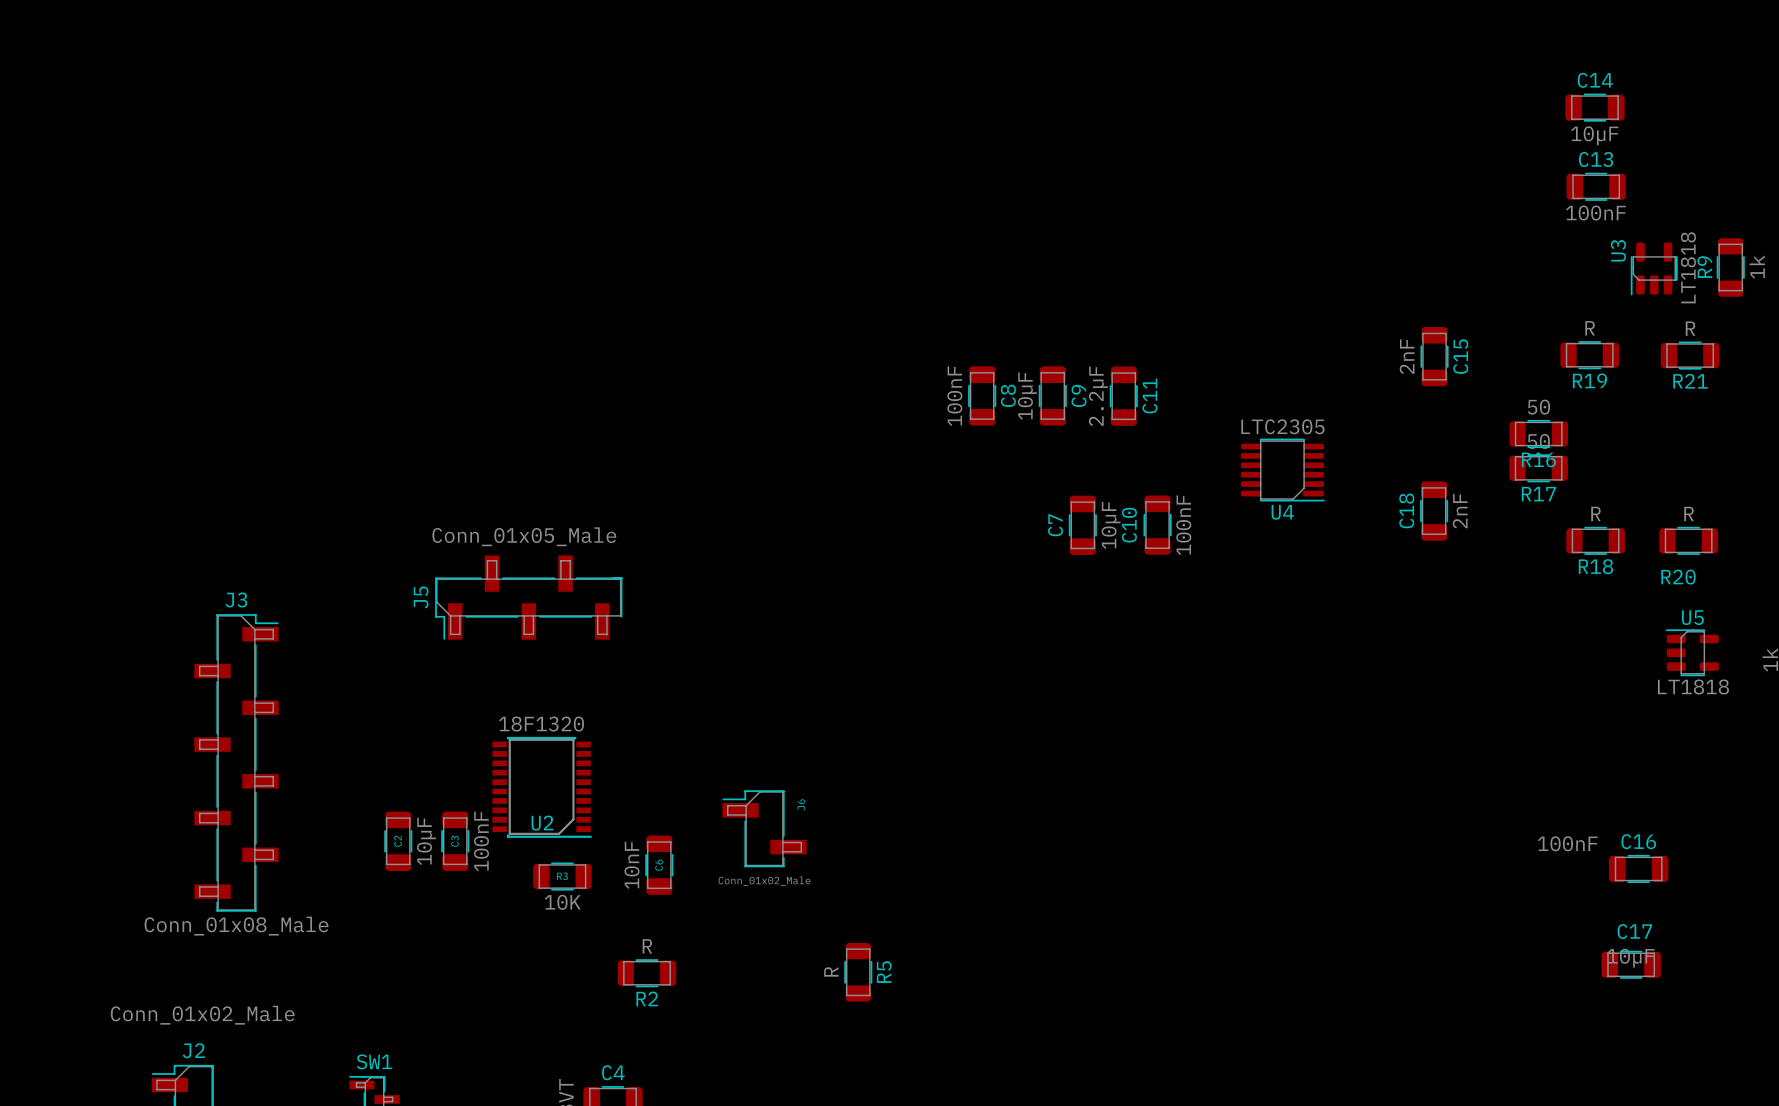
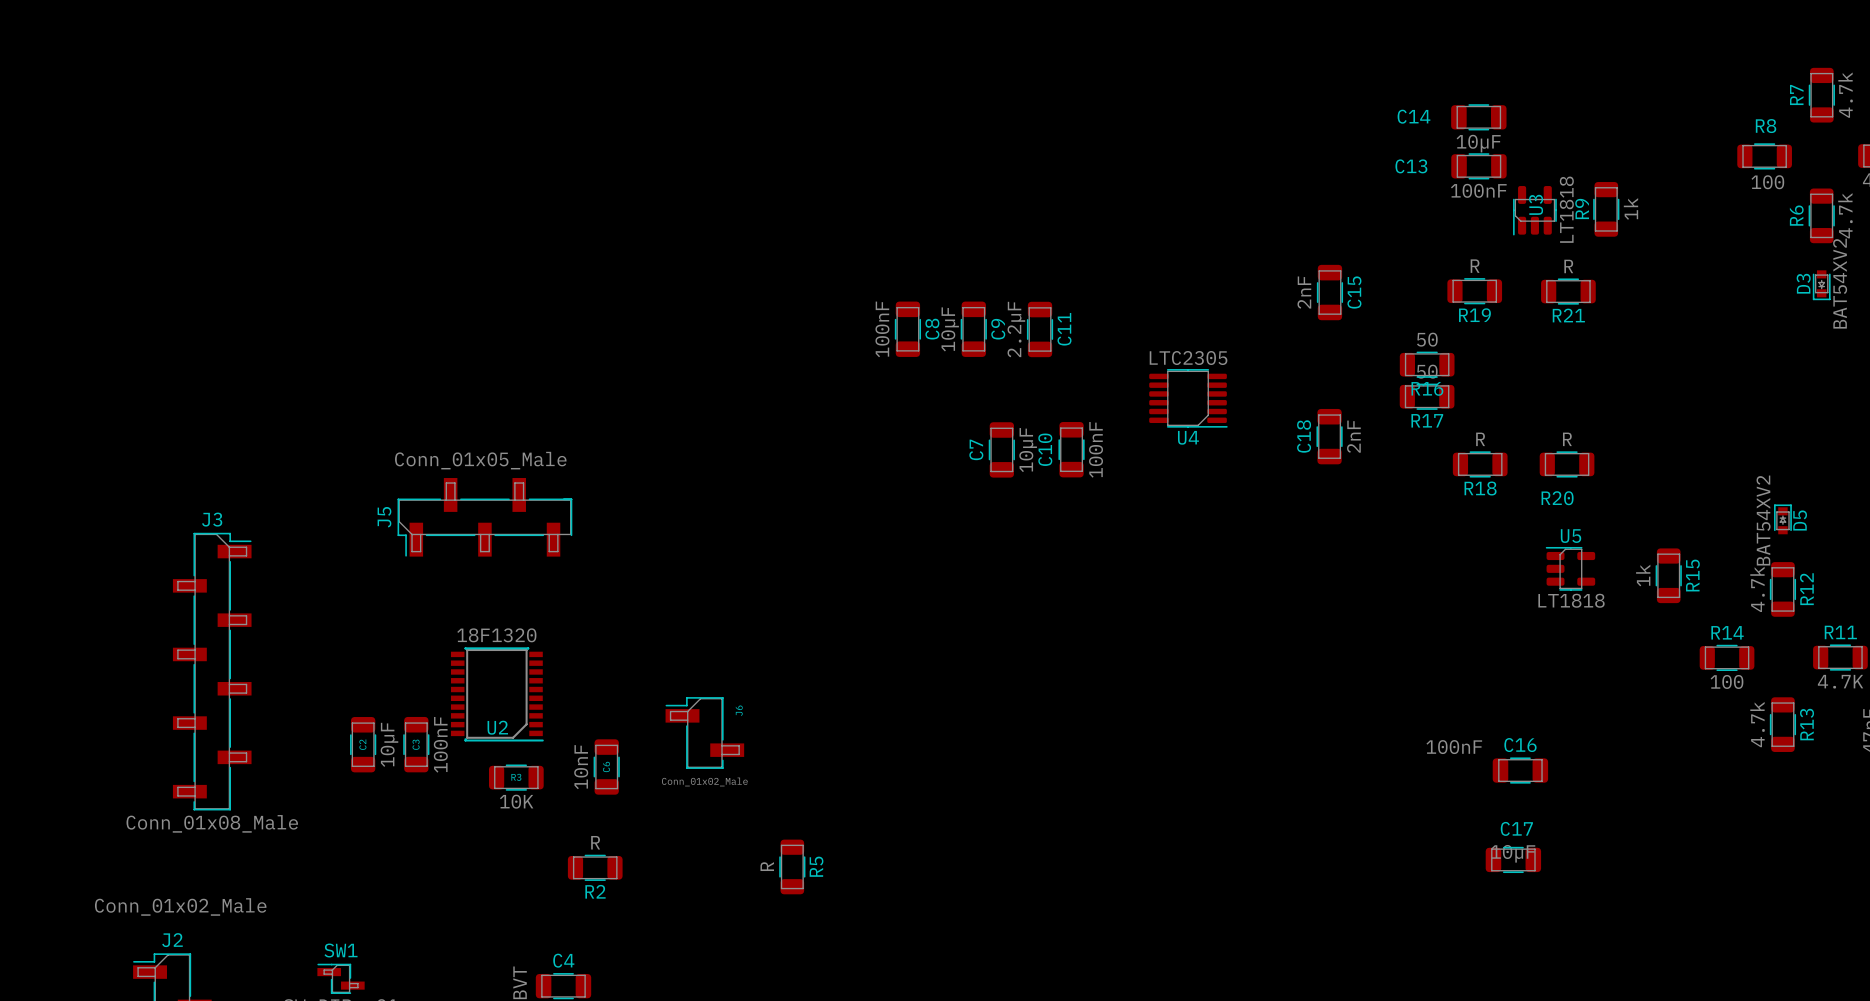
C14 name position: C14 (1595, 80) -> C14 (1413, 116)
C14 position: (1594, 107) -> (1478, 117)
C13 name position: C13 (1596, 159) -> C13 (1411, 166)
C13 position: (1596, 186) -> (1478, 166)
U3 name position: U3 (1618, 250) -> U3 (1536, 204)

